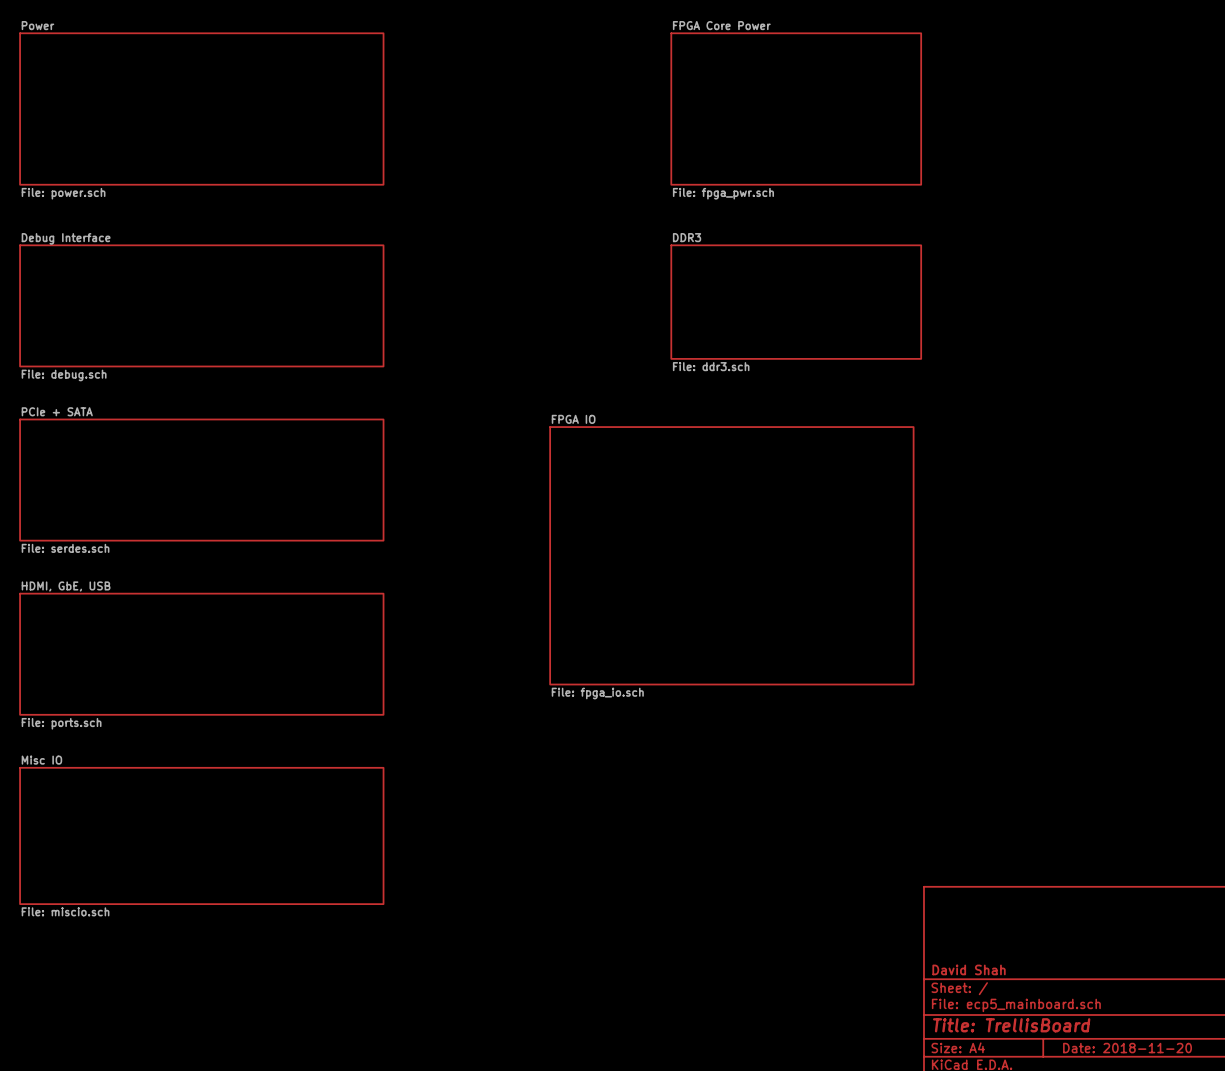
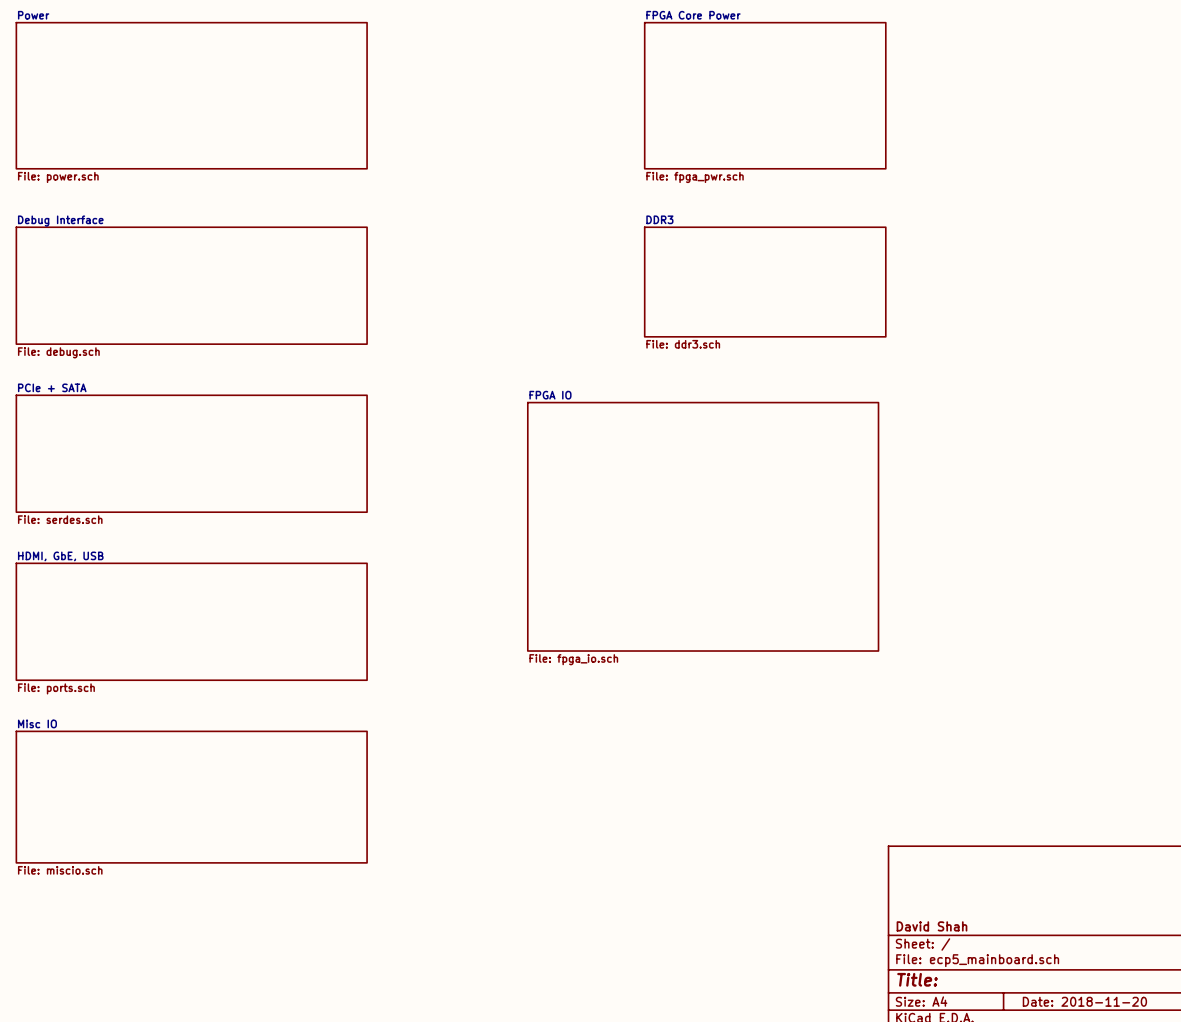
title block: Title: TrellisBoard (1011, 1025) -> Title: (917, 979)

